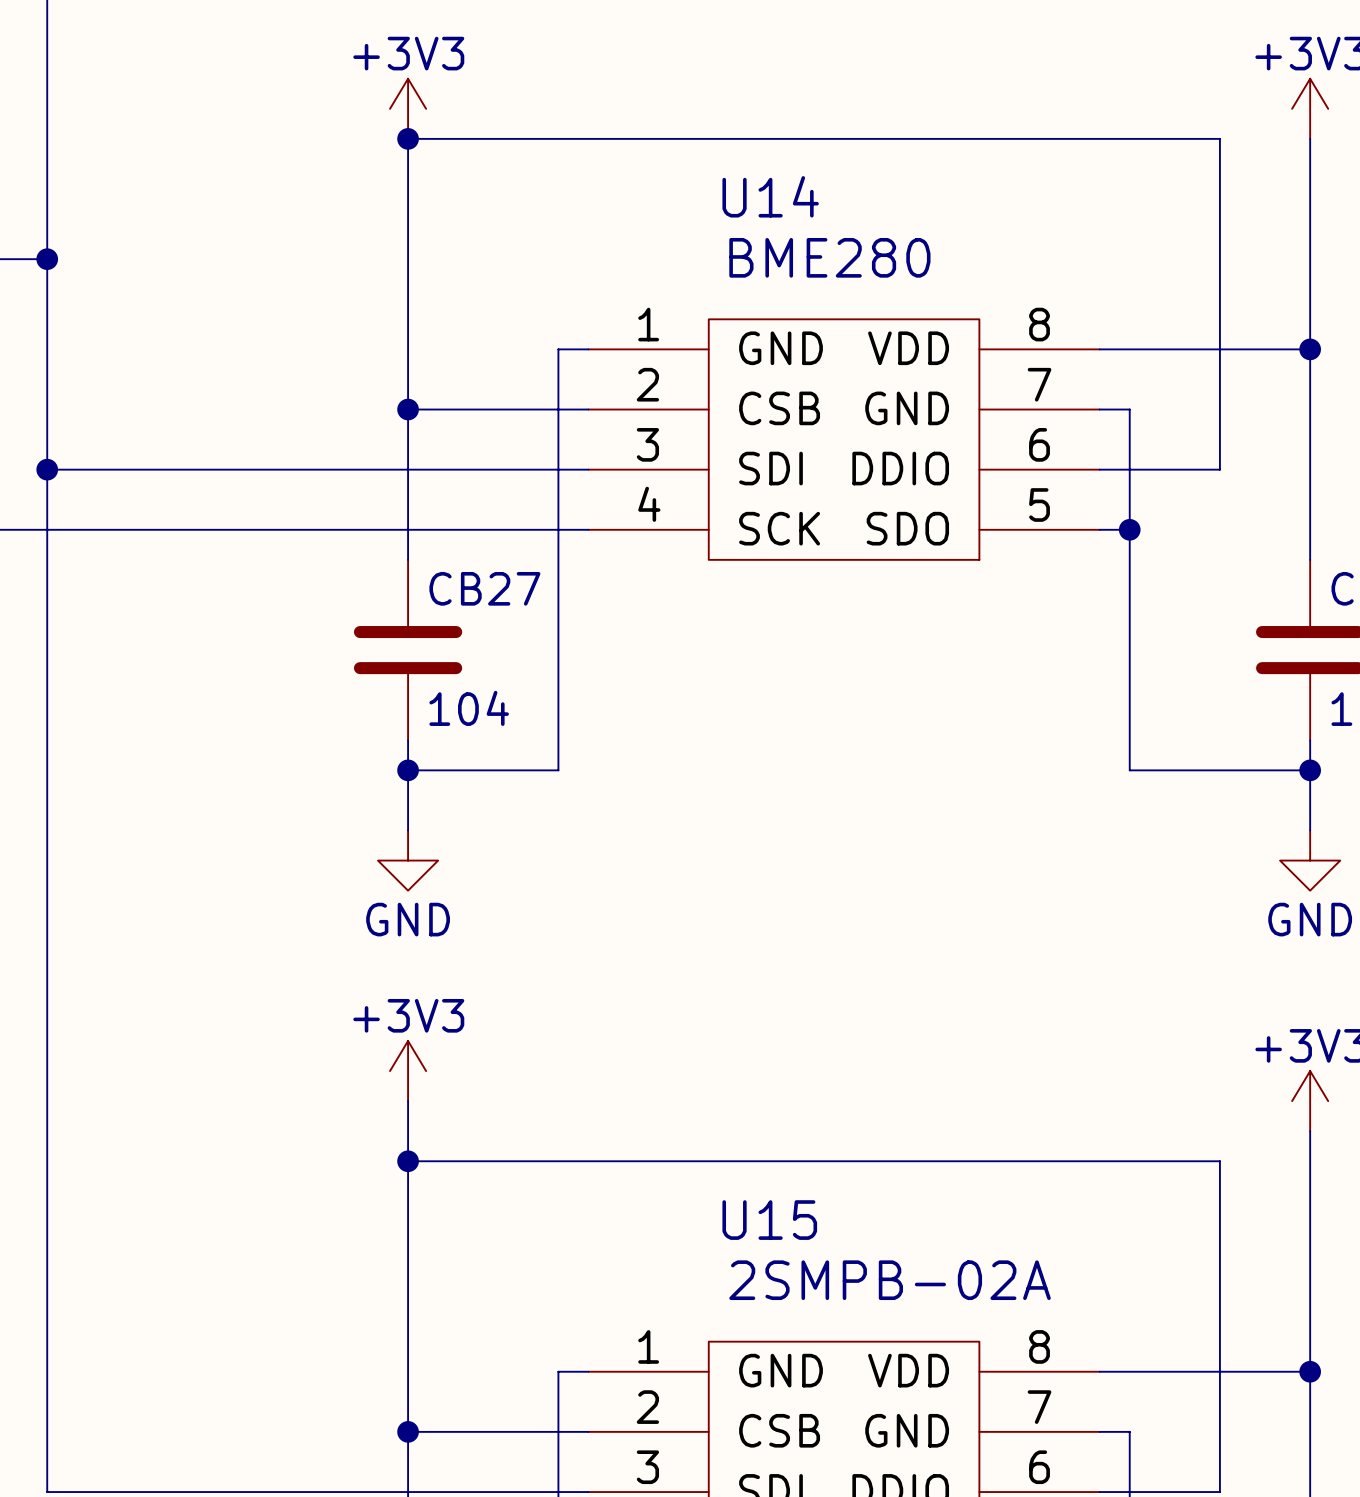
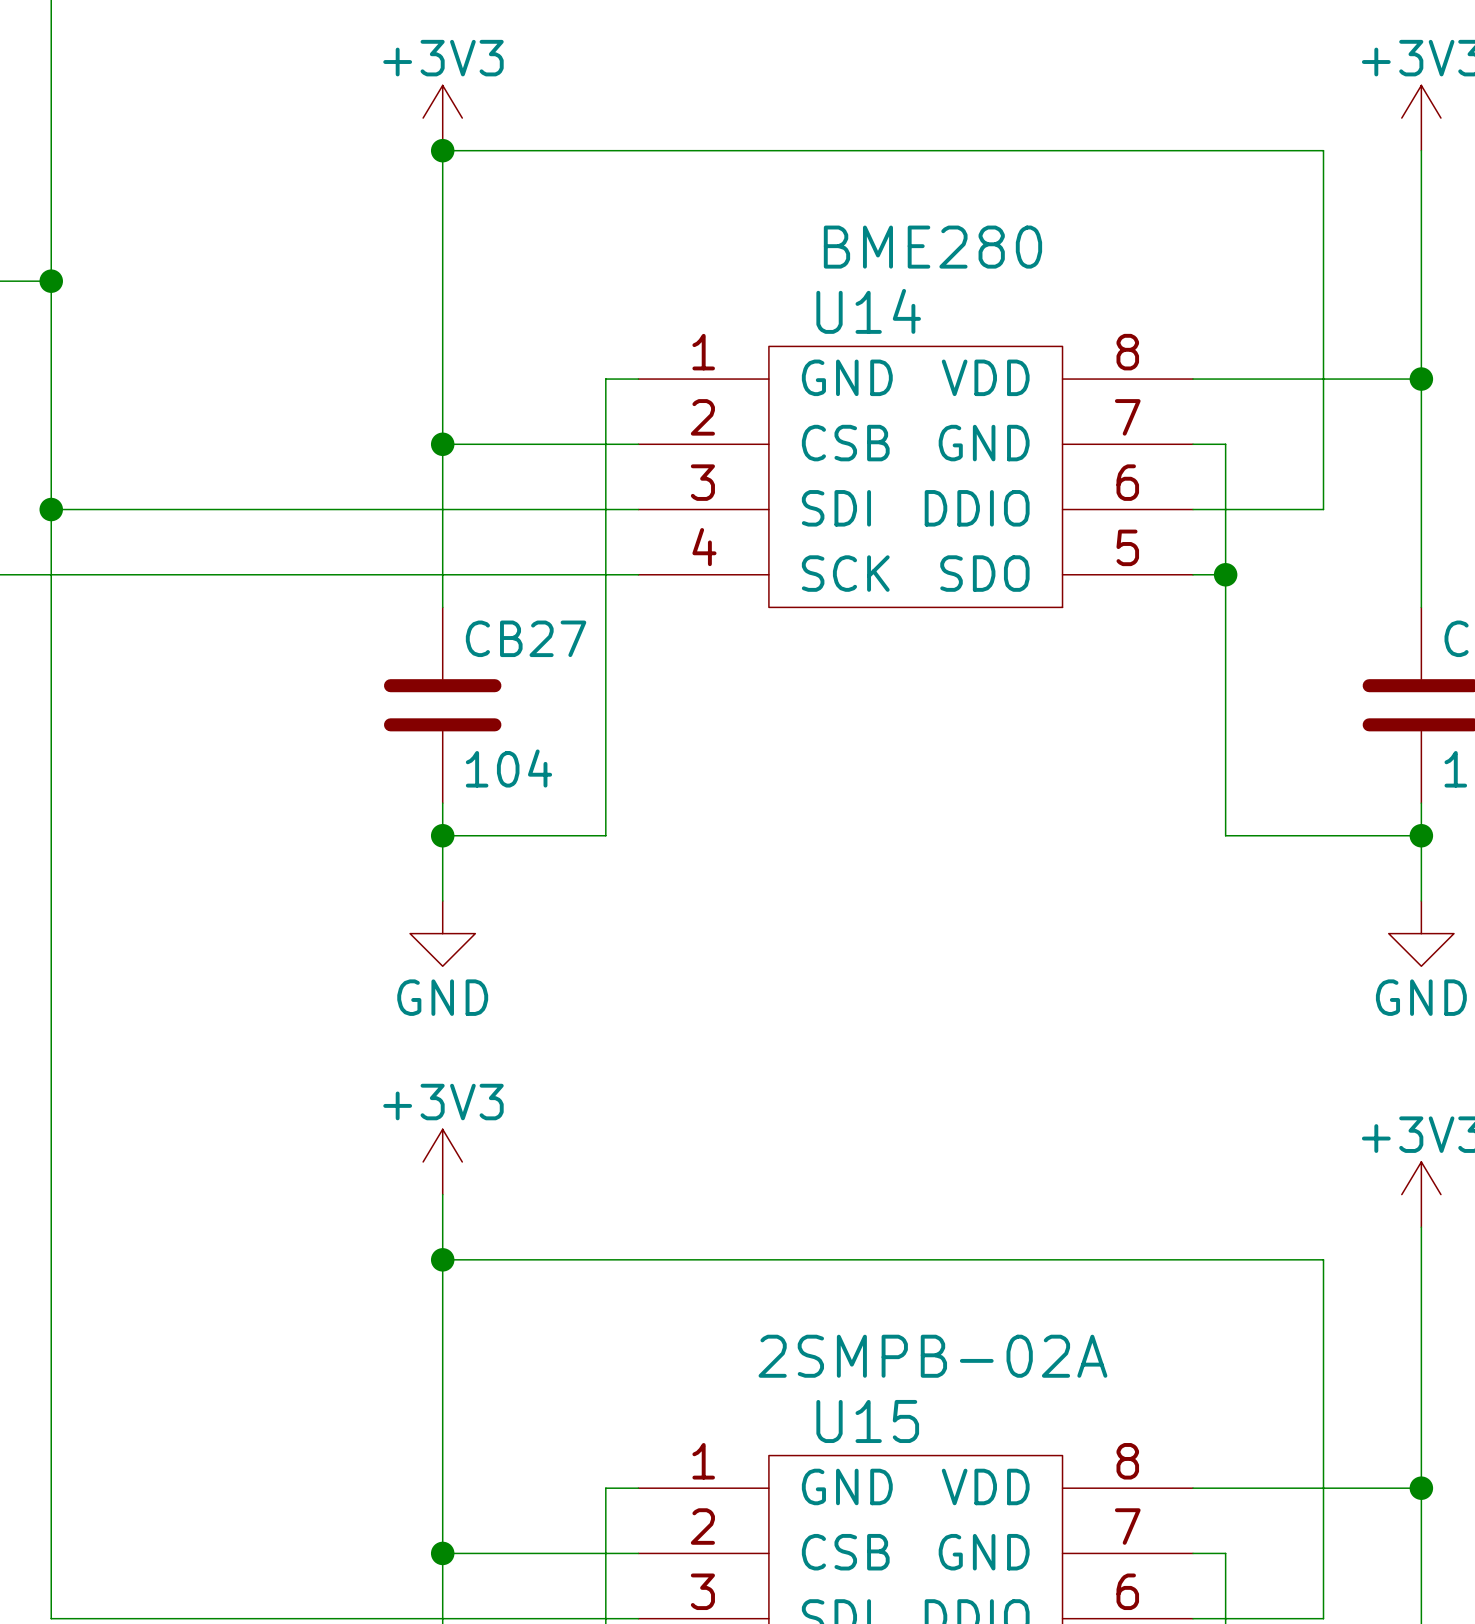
U14 name position: U14 (770, 196) -> U14 (868, 311)
U14 value position: BME280 (829, 257) -> BME280 (932, 247)
U15 name position: U15 (769, 1220) -> U15 (867, 1421)
U15 value position: 2SMPB-02A (890, 1280) -> 2SMPB-02A (932, 1356)

